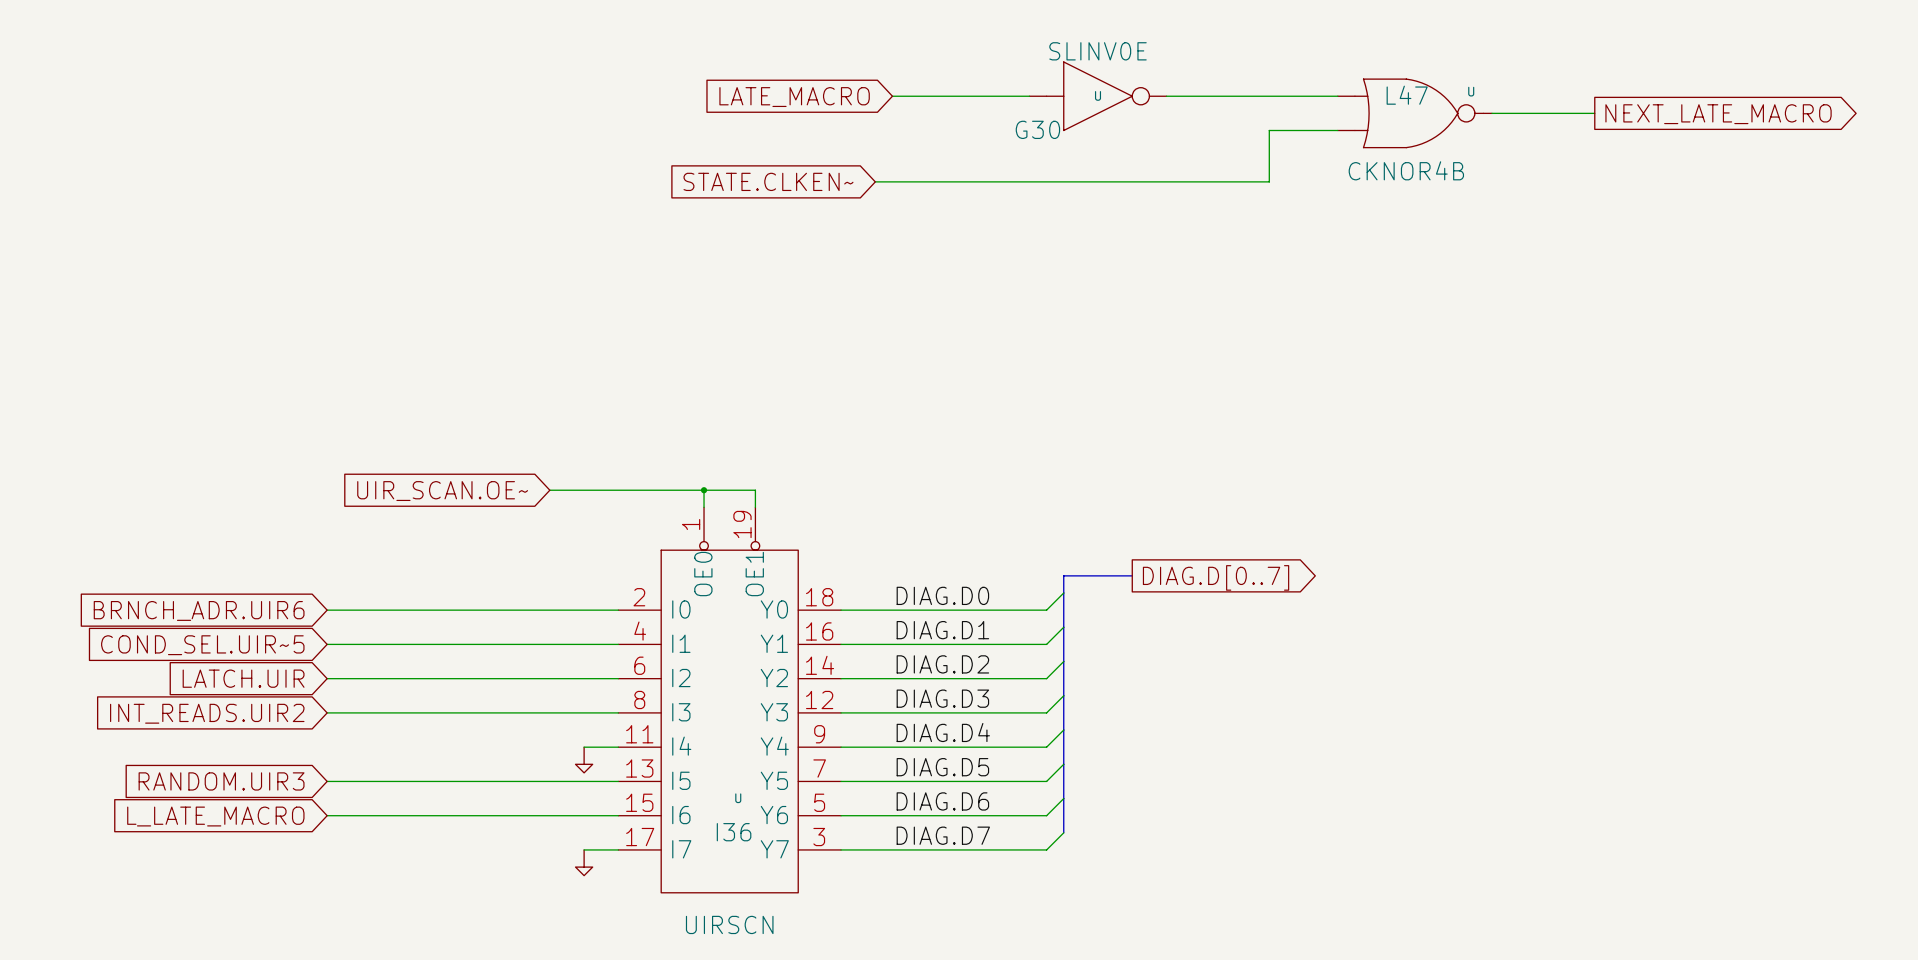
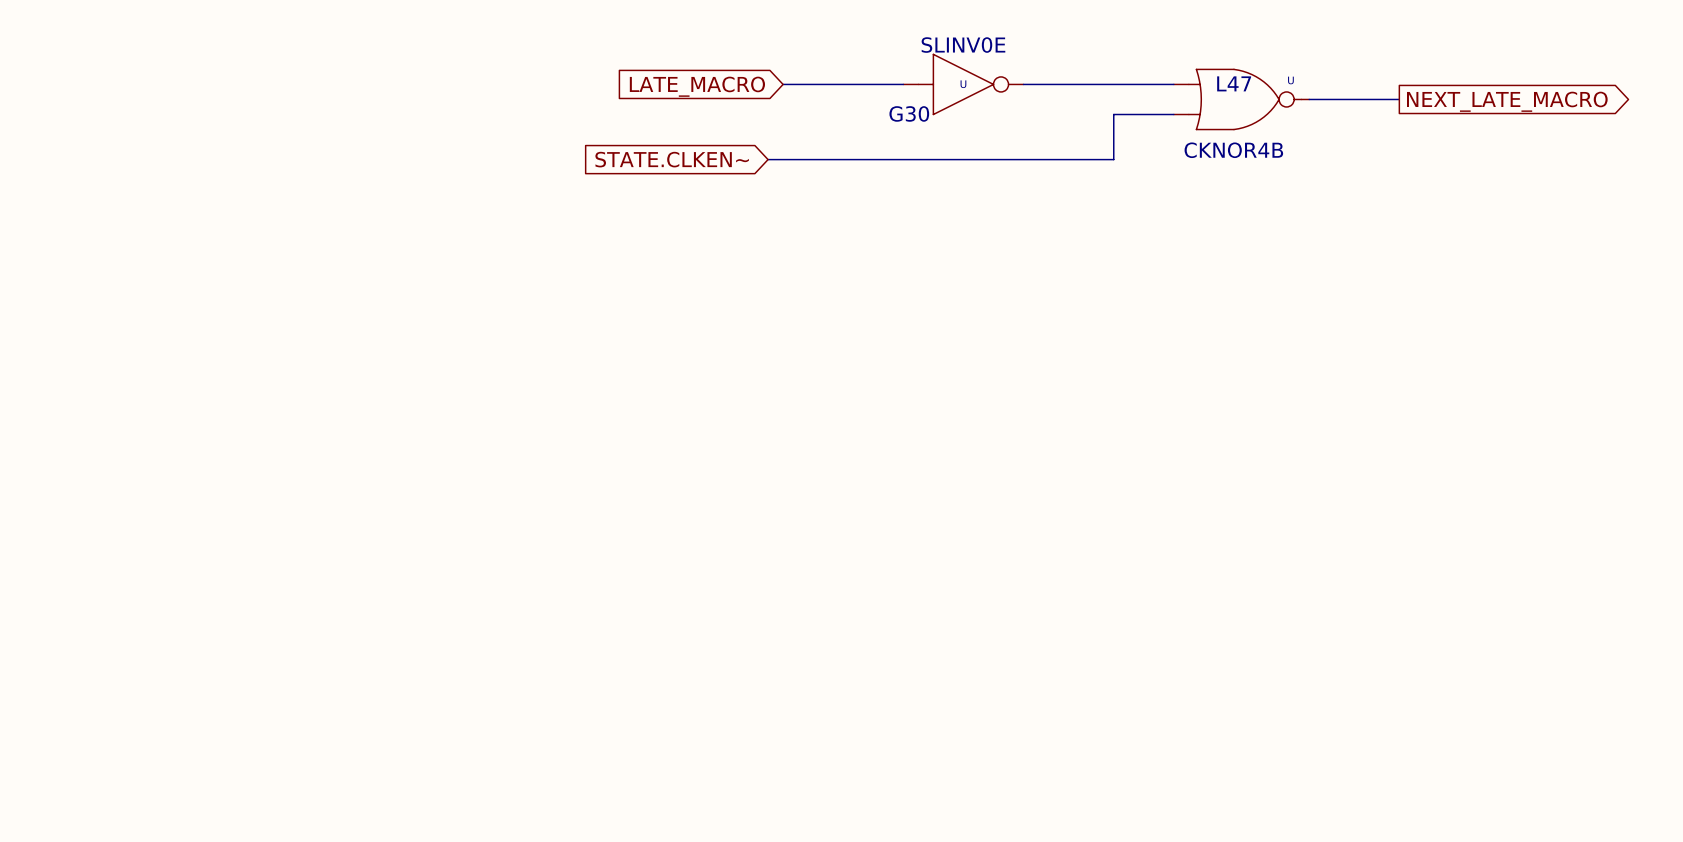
wire: (549, 490) (755, 490) (755, 507) -> none
wire: (704, 490) (704, 507) -> none
junction: (704, 490) -> none
global label: UIR_SCAN.OE~ (442, 491) -> none
bus: (1132, 575) (1063, 575) (1063, 832) -> none
global label: DIAG.D[0..7] (1216, 577) -> none
wire: (1063, 593) (1046, 610) (841, 610) -> none
label: DIAG.D0 (942, 595) -> none
global label: BRNCH_ADR.UIR6 (199, 610) -> none
wire: (327, 610) (618, 610) -> none
wire: (1063, 627) (1046, 644) (841, 644) -> none
label: DIAG.D1 (942, 630) -> none
wire: (327, 644) (618, 644) -> none
global label: COND_SEL.UIR~5 (202, 645) -> none
wire: (1063, 661) (1046, 678) (841, 678) -> none
label: DIAG.D2 (942, 664) -> none
global label: LATCH.UIR (243, 678) -> none
wire: (327, 678) (618, 678) -> none
wire: (1063, 695) (1046, 712) (841, 712) -> none
label: DIAG.D3 (942, 698) -> none
U: (729, 700) -> none
wire: (327, 712) (618, 712) -> none
global label: INT_READS.UIR2 (207, 713) -> none
wire: (1063, 730) (1046, 747) (841, 747) -> none
label: DIAG.D4 (943, 732) -> none
wire: (584, 747) (618, 747) -> none
power symbol: (584, 760) -> none
wire: (1063, 764) (1046, 781) (841, 781) -> none
label: DIAG.D5 (942, 767) -> none
global label: RANDOM.UIR3 (221, 781) -> none
wire: (327, 781) (618, 781) -> none
wire: (1063, 798) (1046, 815) (841, 815) -> none
label: DIAG.D6 (942, 801) -> none
wire: (327, 815) (618, 815) -> none
global label: L_LATE_MACRO (215, 816) -> none
wire: (1063, 832) (1046, 849) (841, 849) -> none
label: DIAG.D7 (943, 835) -> none
wire: (584, 849) (618, 849) -> none
power symbol: (584, 863) -> none

